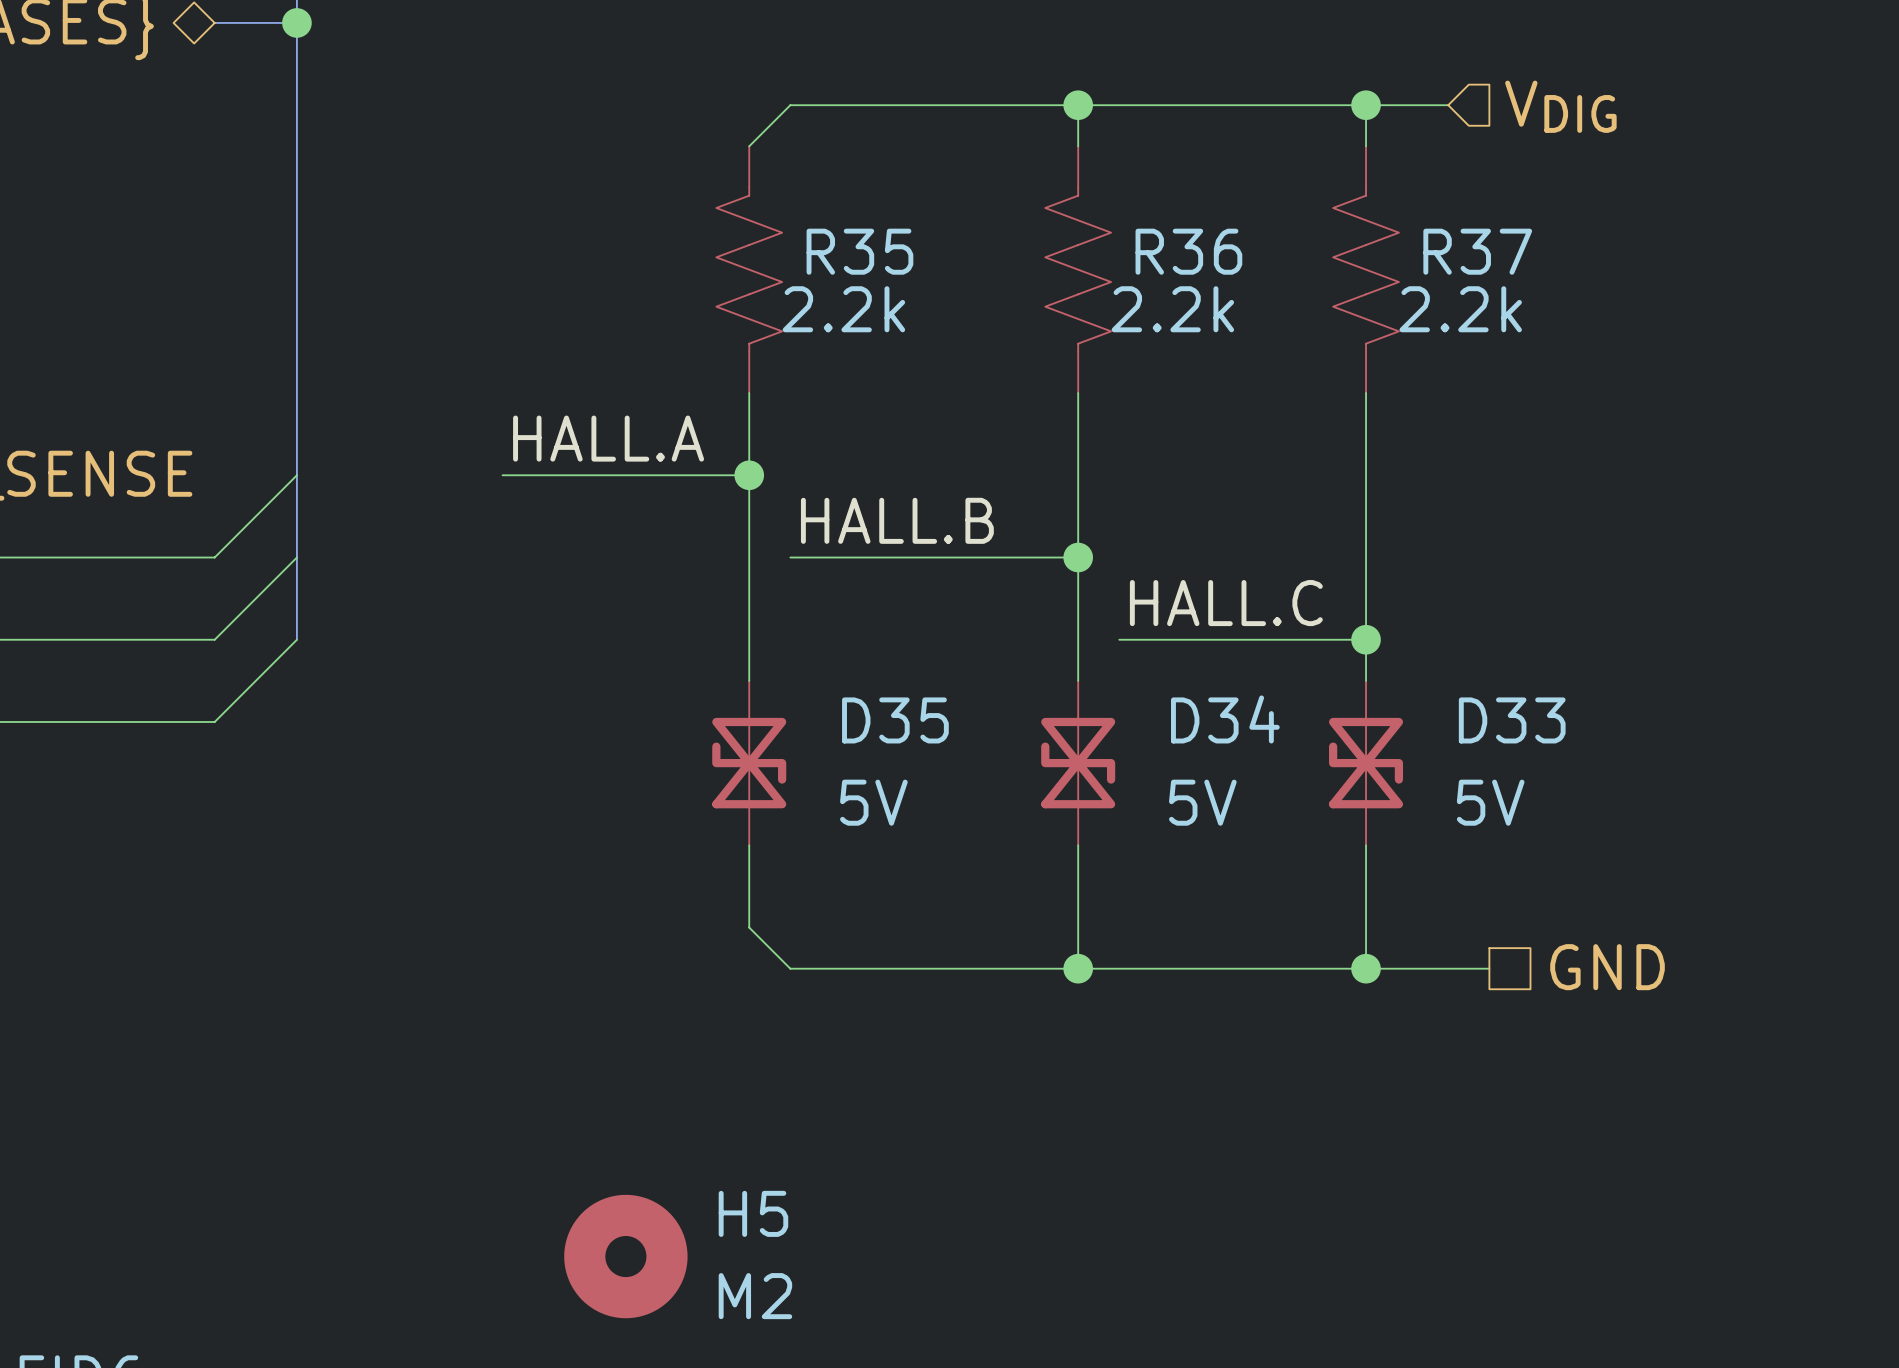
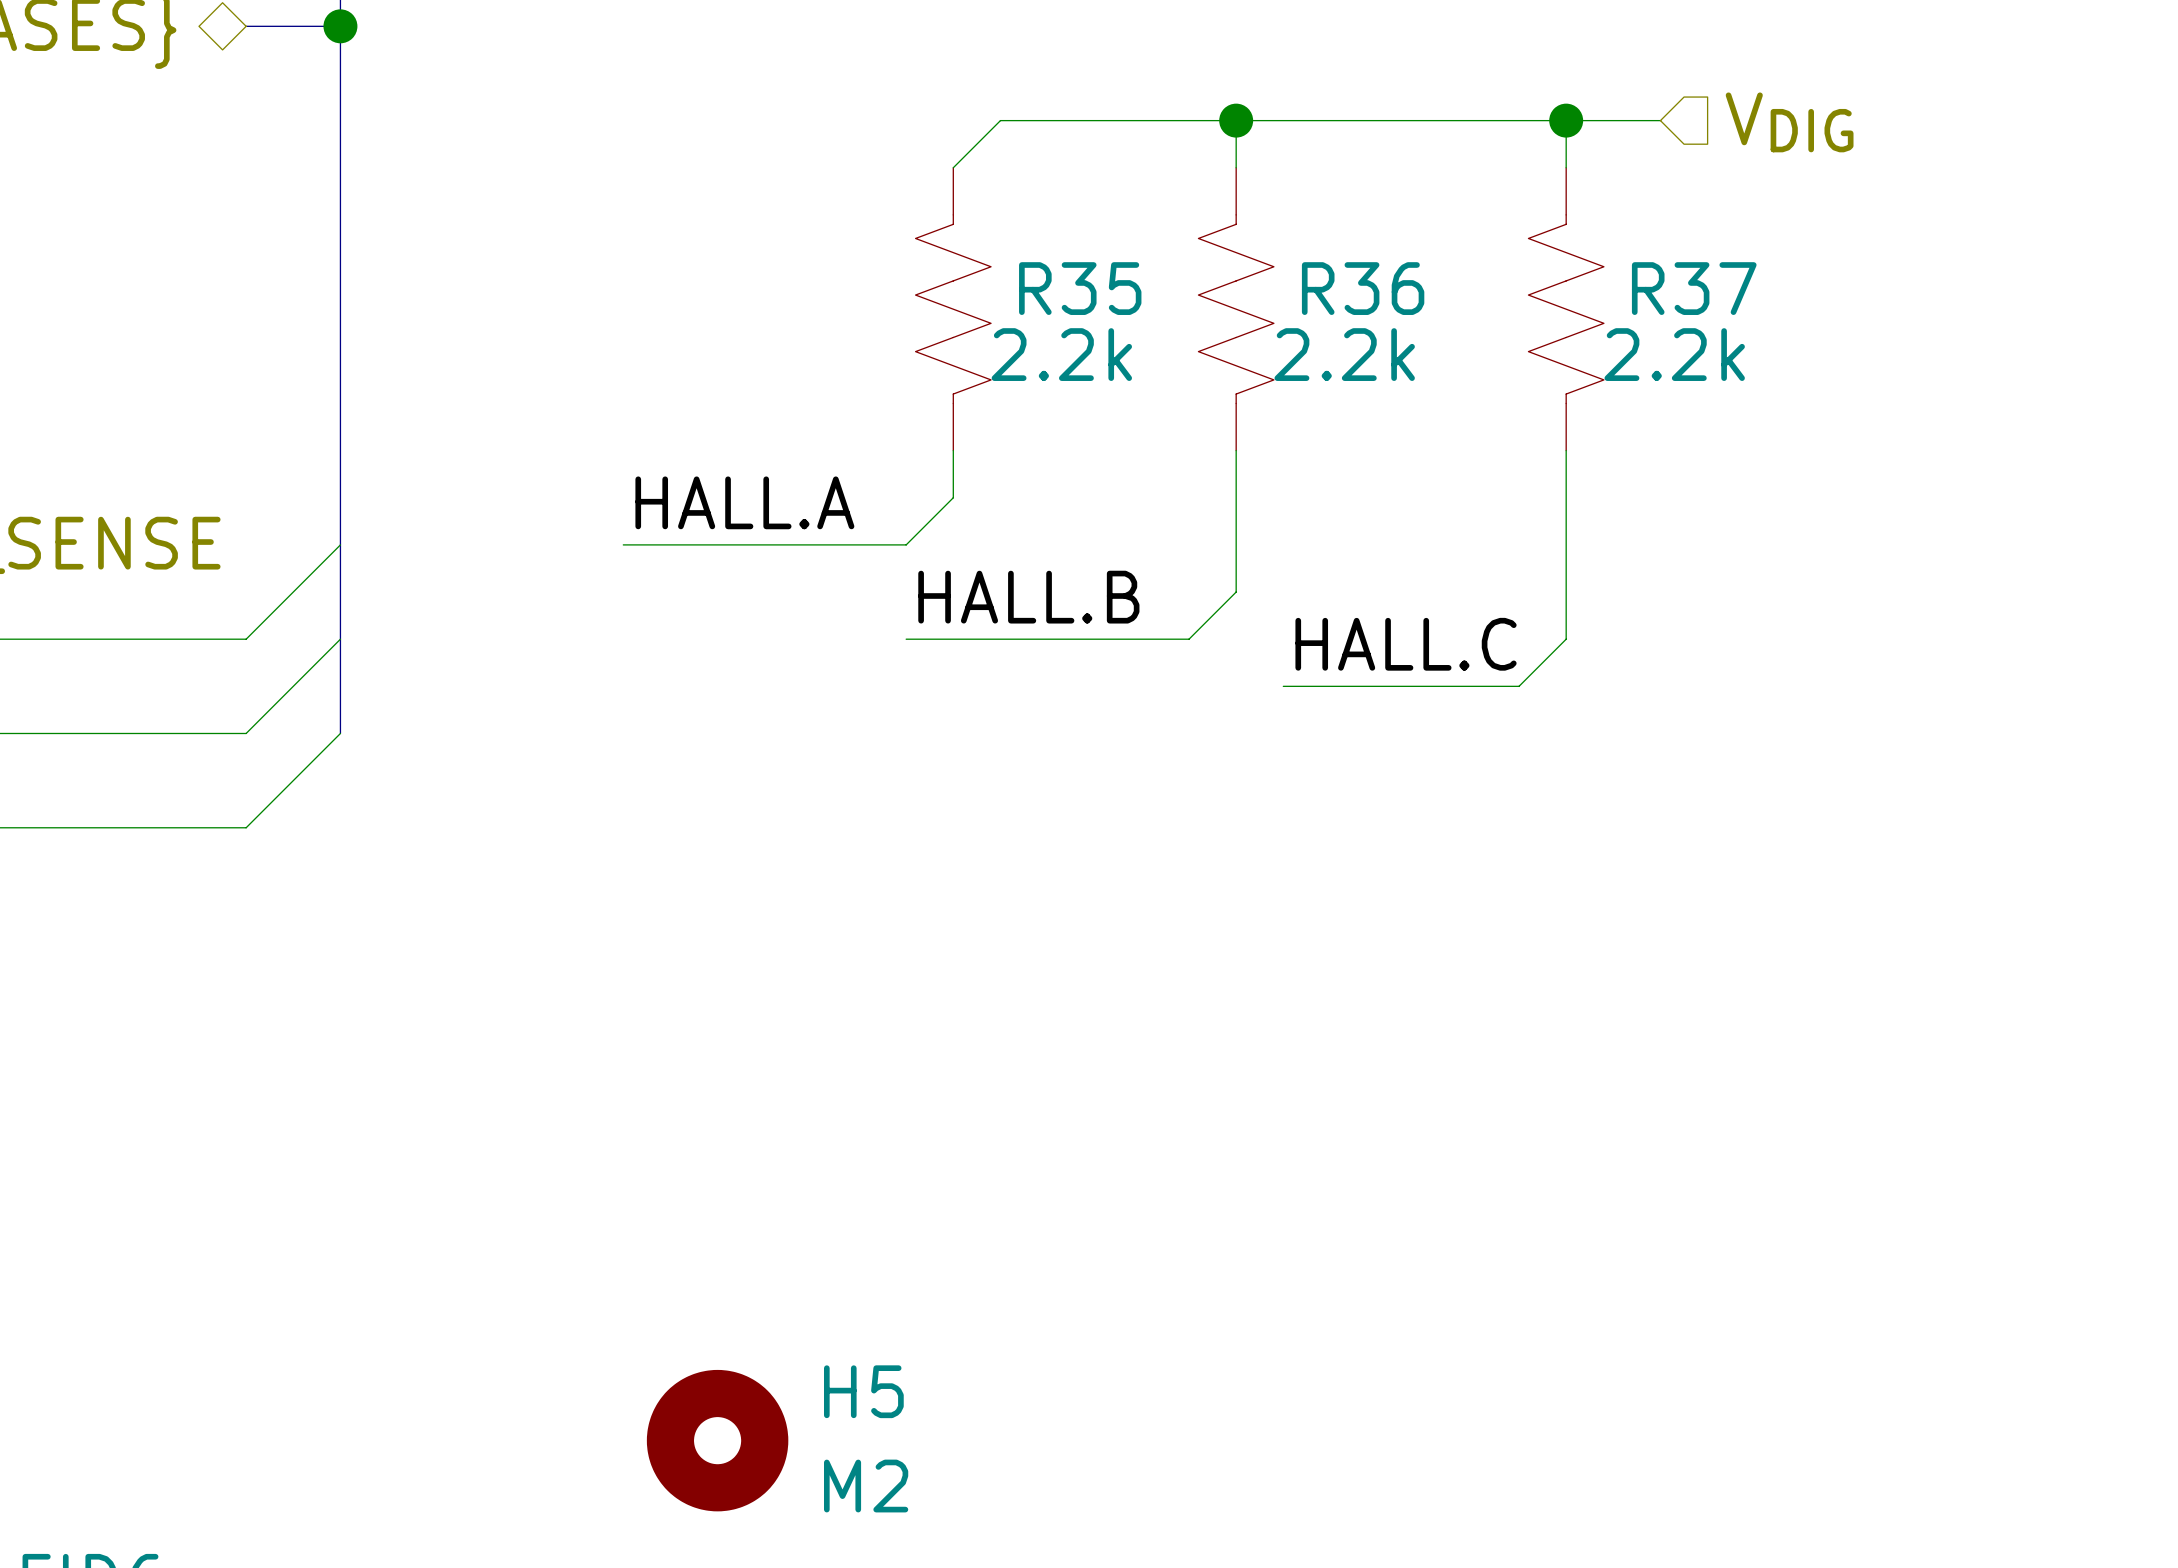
wire: (872, 105) (790, 105) (749, 146) -> (1000, 120) (953, 167)
R35 position: (749, 269) -> (953, 309)
wire: (749, 393) (749, 680) -> none
wire: none -> (953, 450) (953, 497) (906, 544) (859, 544)
label position: HALL.A (608, 438) -> HALL.A (744, 502)
wire: (502, 475) (543, 475) -> none
junction: (749, 475) -> none
wire: (1078, 516) (1078, 680) -> none
wire: (1037, 557) (1078, 557) -> (1189, 639) (1236, 592)
junction: (1078, 557) -> none
wire: (1366, 557) (1366, 680) -> (1566, 639) (1519, 686) (1283, 686)
label position: HALL.C (1226, 603) -> HALL.C (1406, 644)
wire: (1119, 639) (1366, 639) -> none
junction: (1366, 639) -> none
D35: 5V (749, 763) -> none
D34: 5V (1078, 763) -> none
D33: 5V (1366, 763) -> none
wire: (749, 845) (749, 927) (790, 968) (1489, 968) -> none
wire: (1078, 845) (1078, 968) -> none
wire: (1366, 845) (1366, 968) -> none
hierarchical label: GND (1607, 967) -> none
junction: (1078, 968) -> none
junction: (1366, 968) -> none

